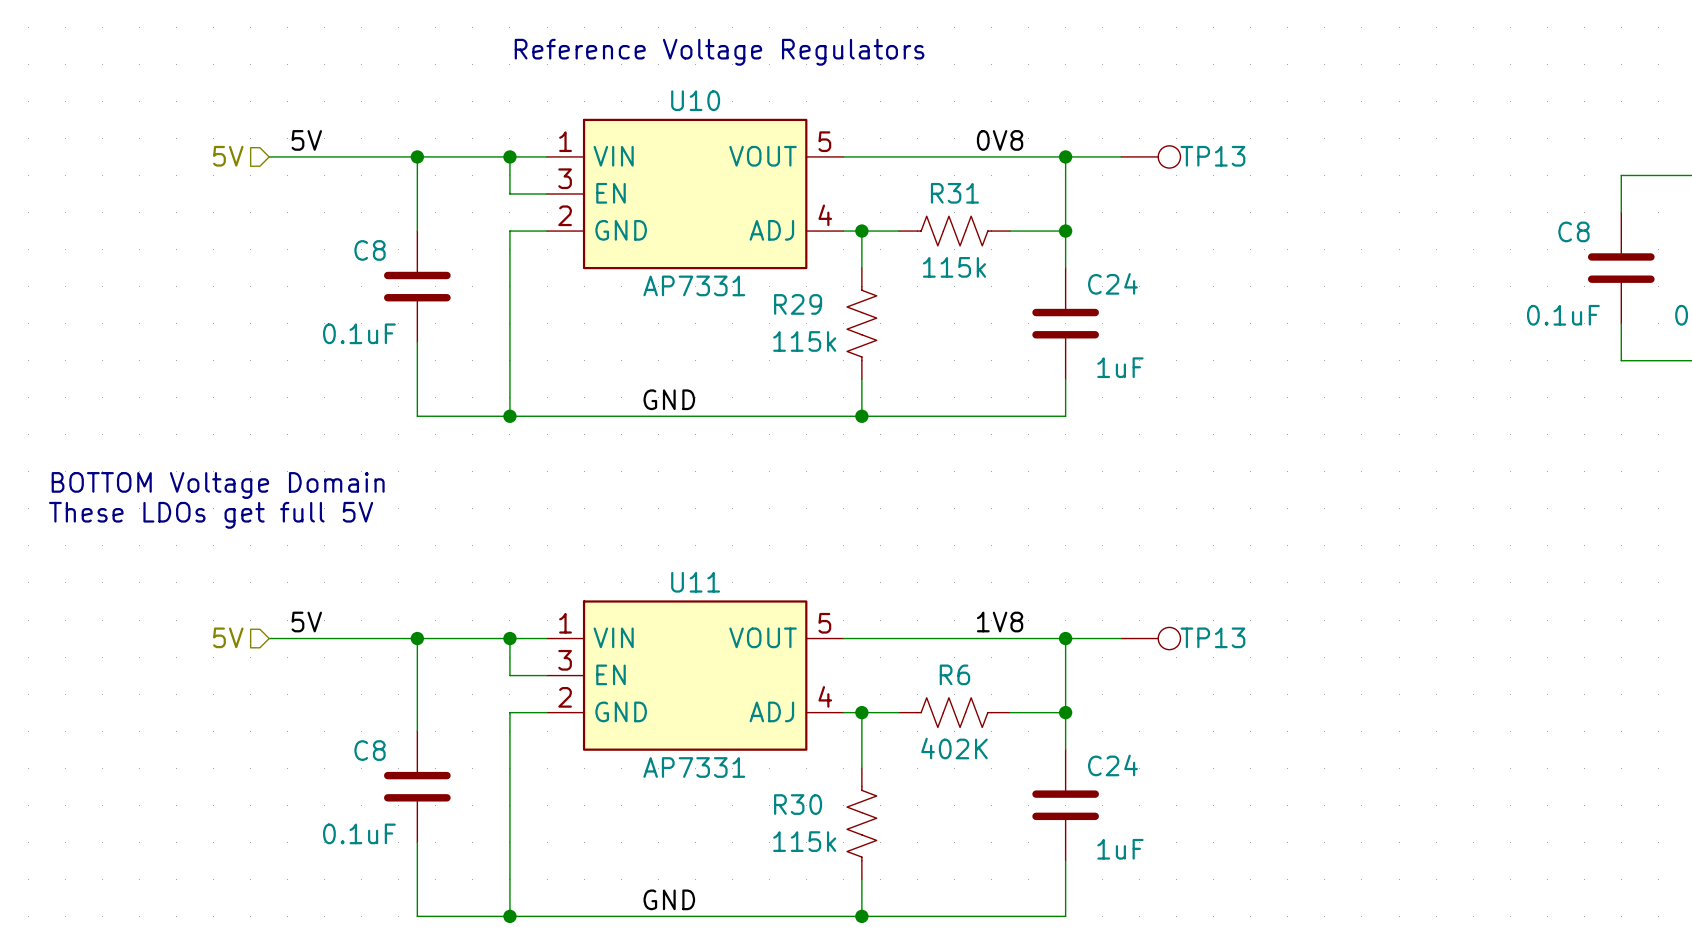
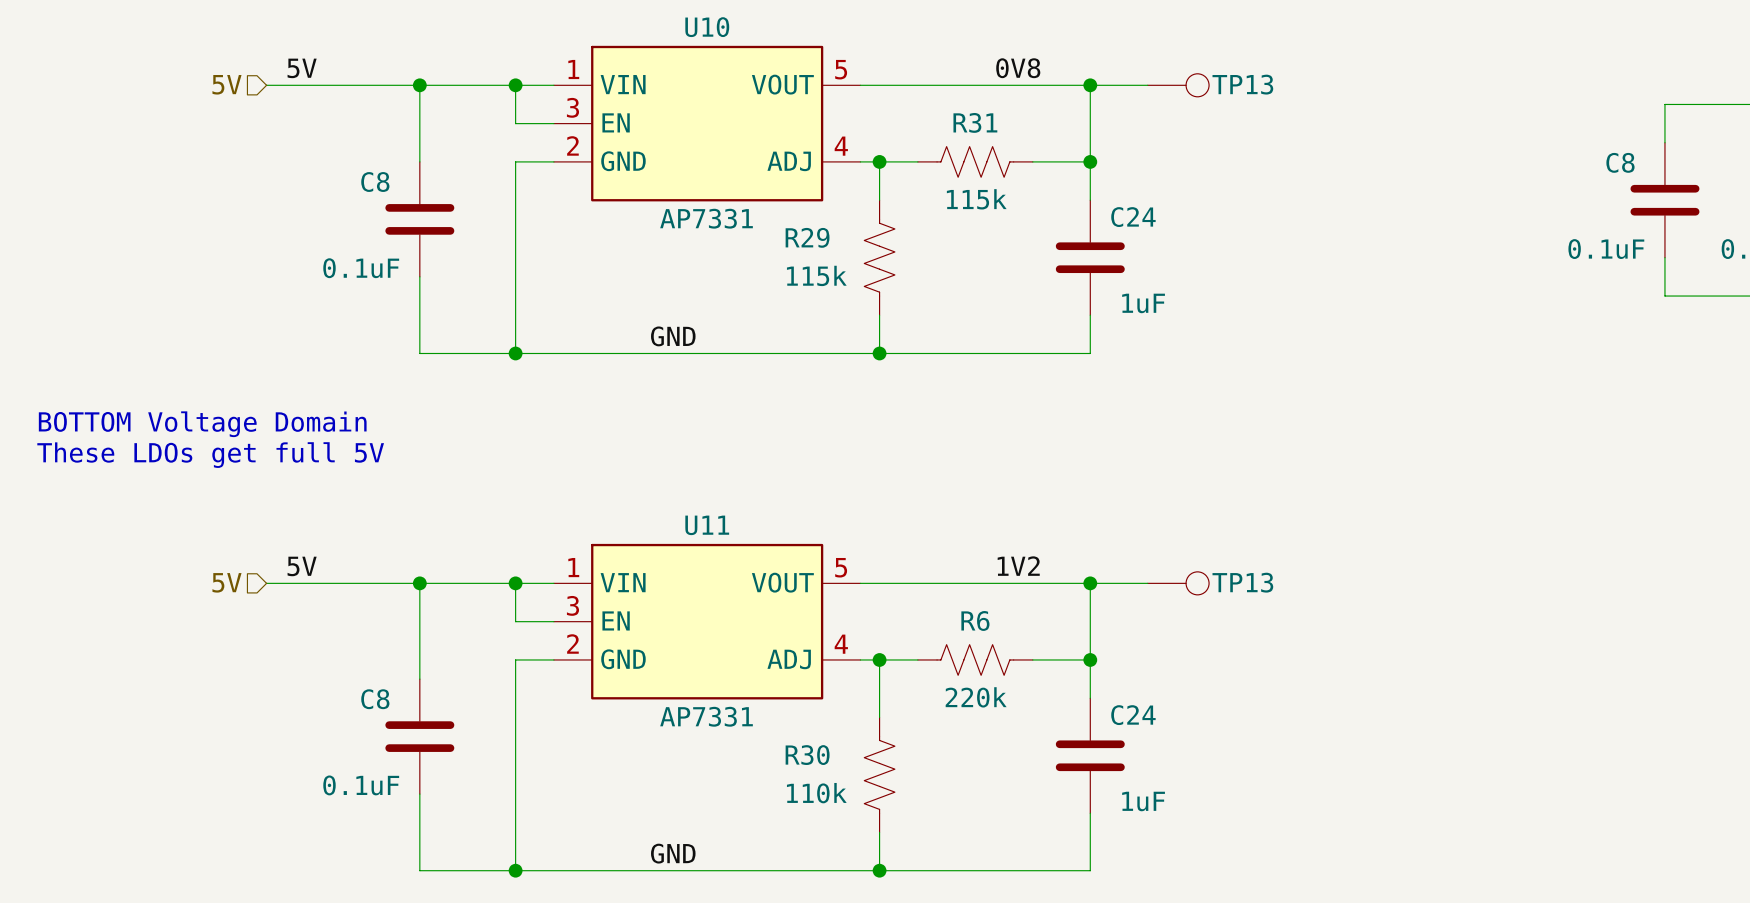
label: 1V8 (1000, 622) -> 1V2 (1018, 566)
R6 value: 402K (954, 748) -> 220k (976, 697)
R30 value: 115k (804, 841) -> 110k (816, 793)

